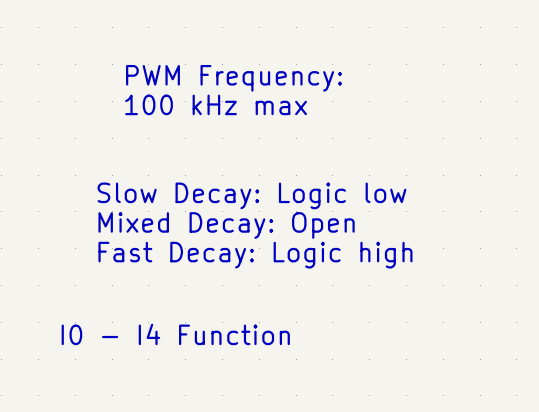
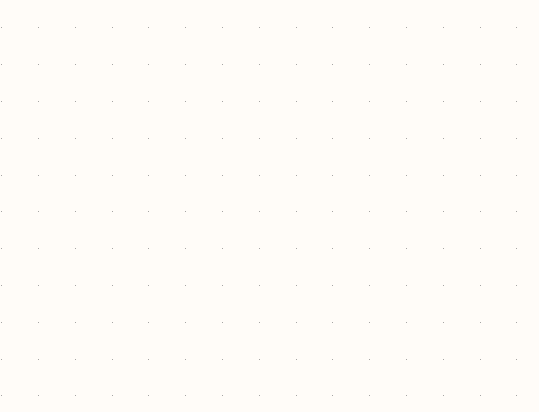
text: PWM Frequency: (234, 78) -> none
text: 100 kHz max (216, 104) -> none
text: Slow Decay: Logic low (251, 195) -> none
text: Mixed Decay: Open (226, 225) -> none
text: Fast Decay: Logic high (255, 255) -> none
text: I0 - I4 Function (175, 334) -> none

